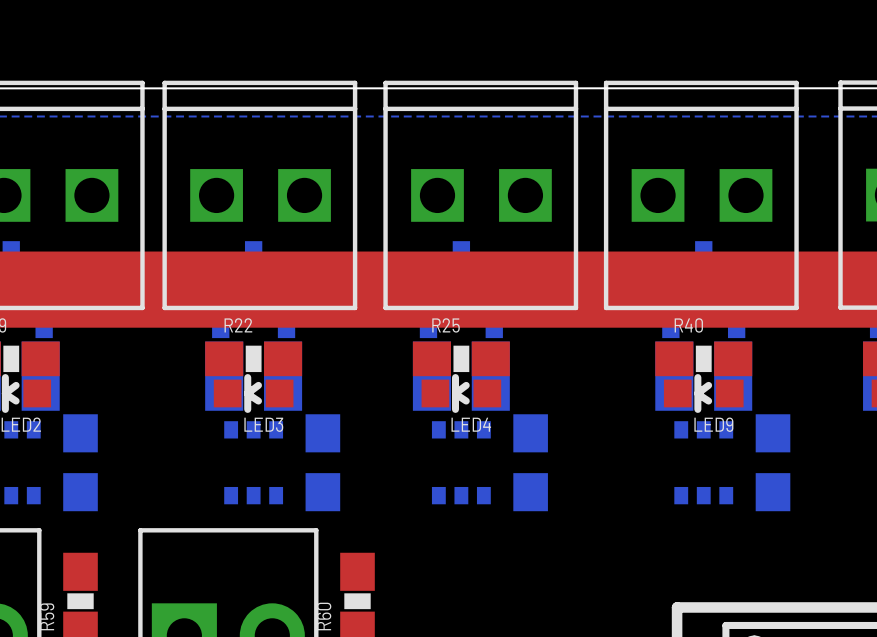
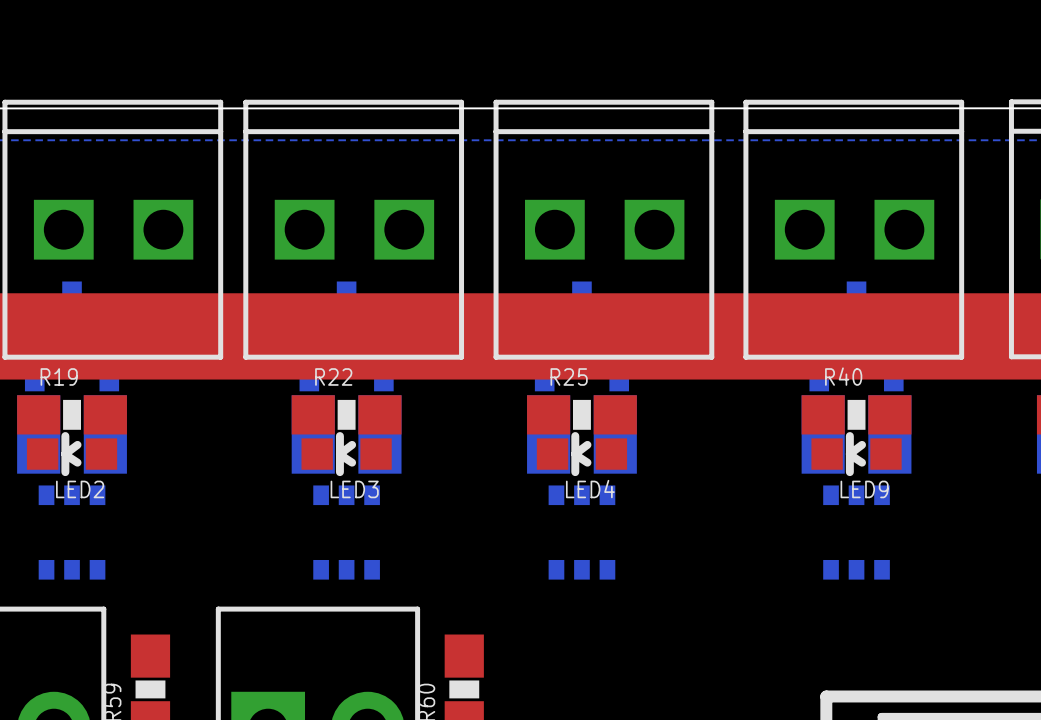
part: (80, 462) -> none
part: (322, 462) -> none
part: (530, 462) -> none
part: (773, 462) -> none

